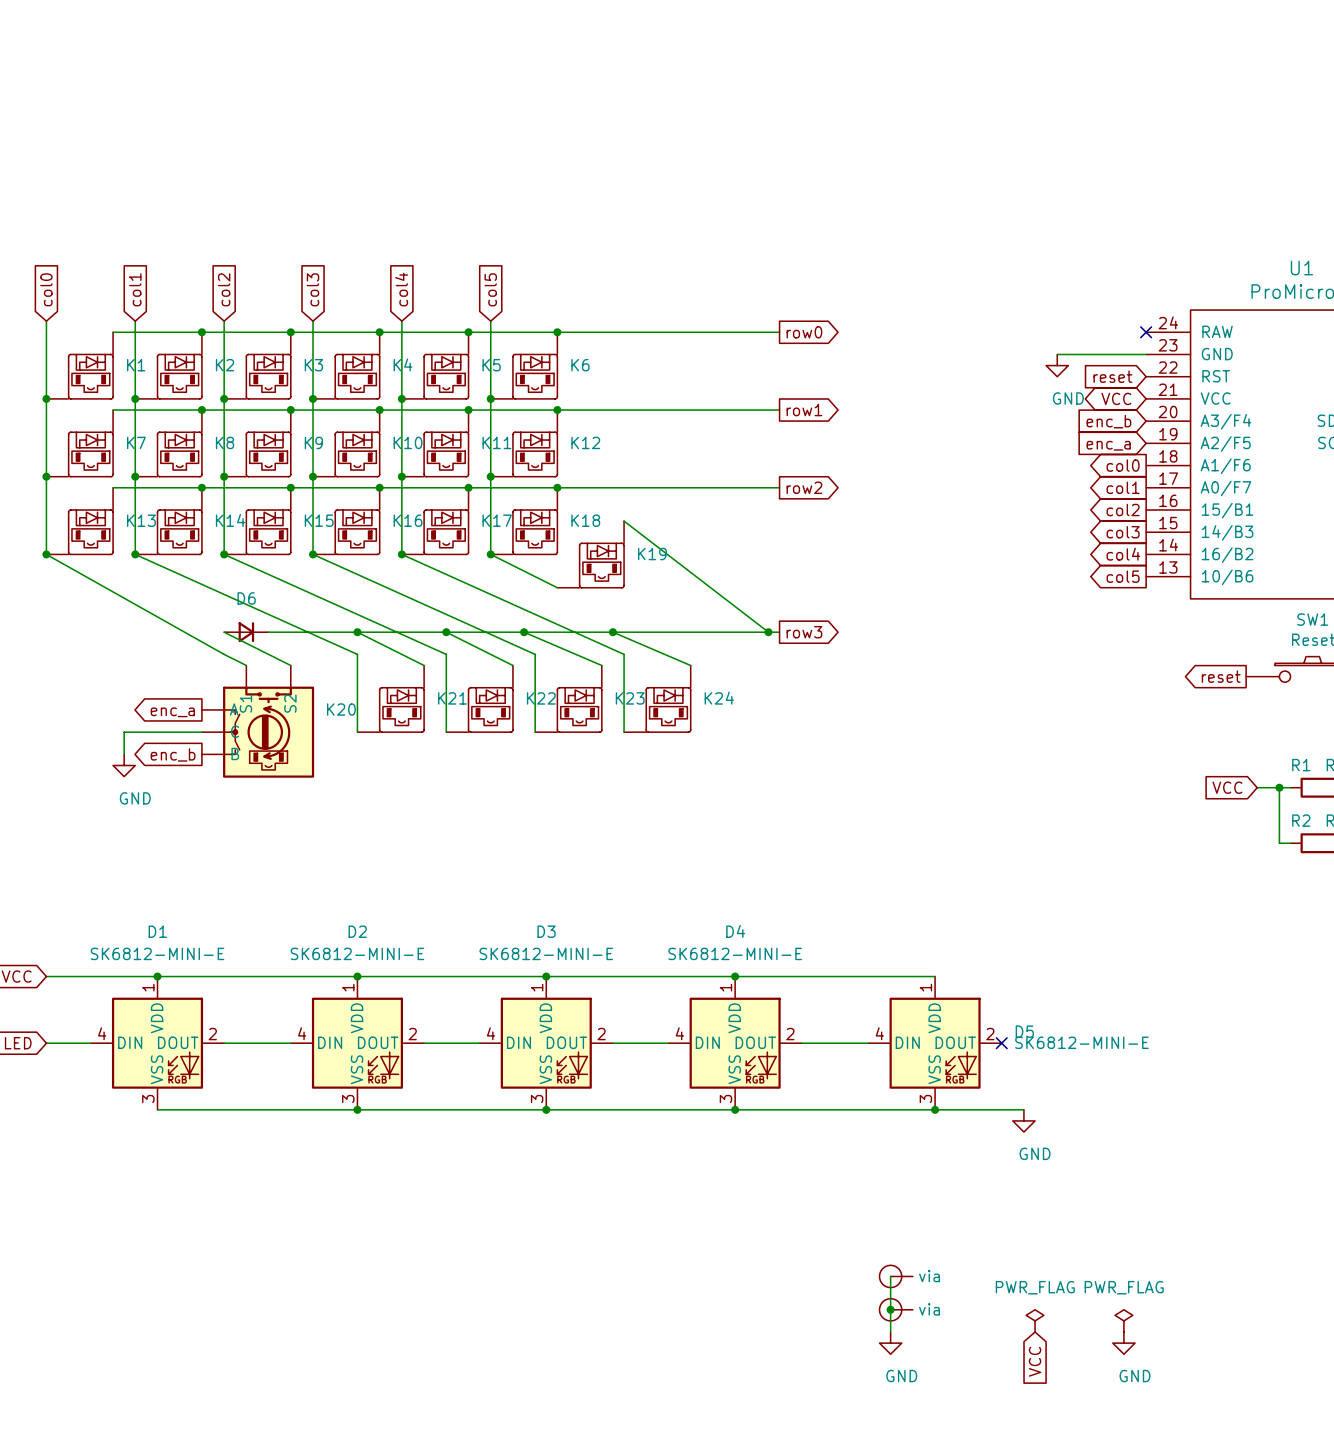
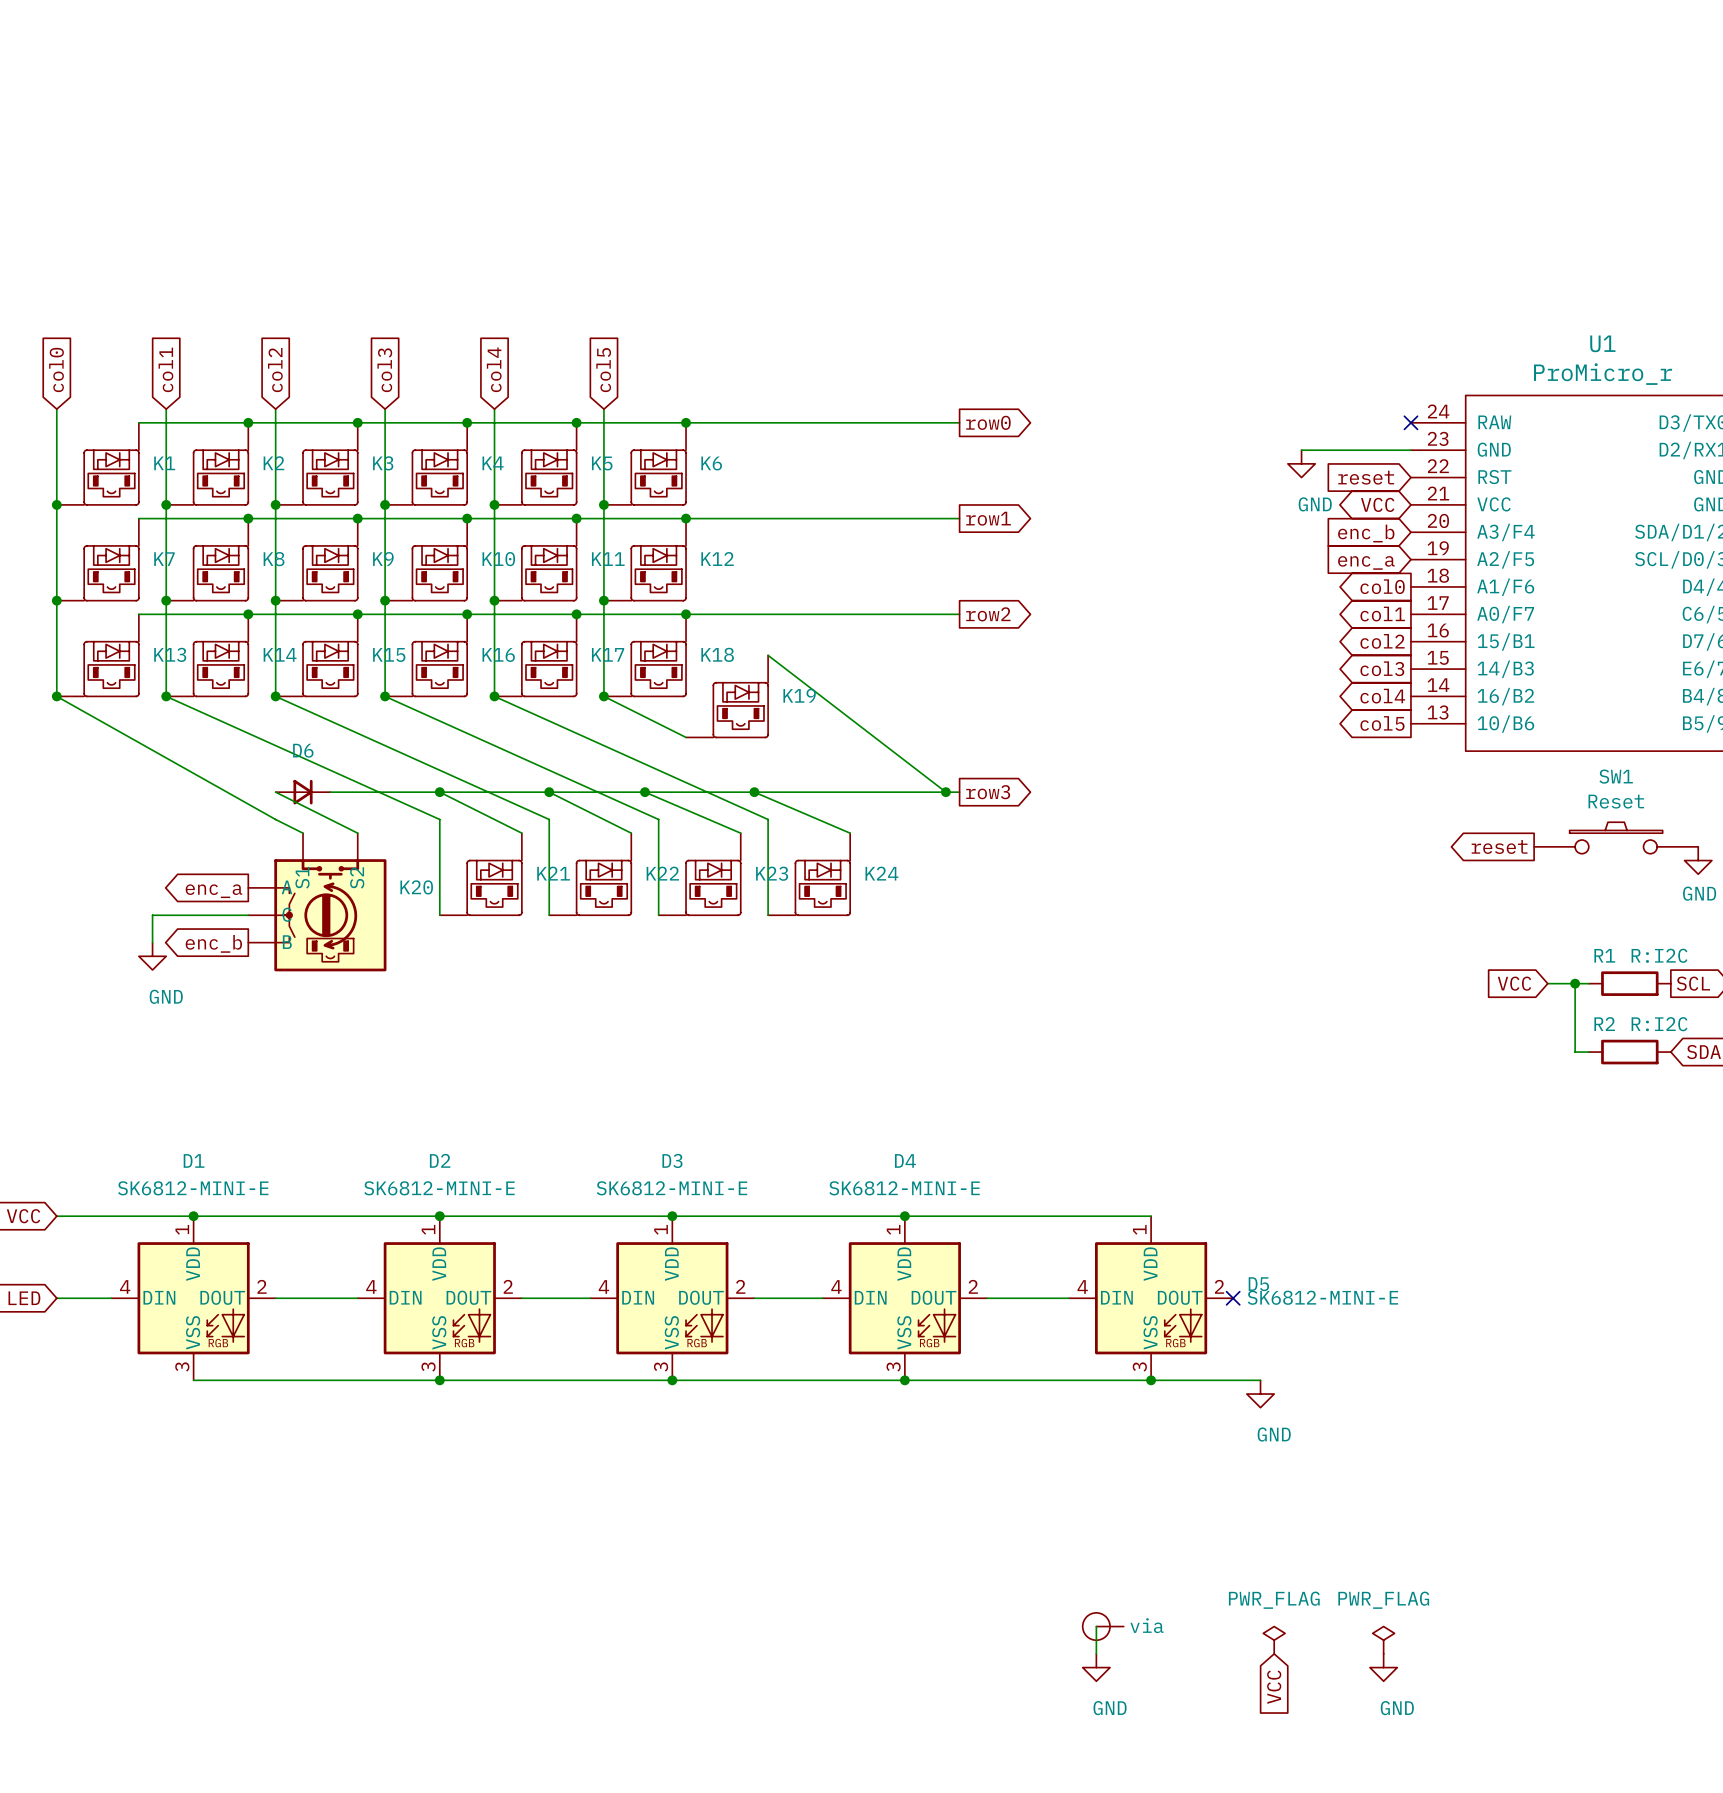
wire: (890, 1276) (890, 1309) -> none
part: (896, 1276) -> none
junction: (890, 1309) -> none

